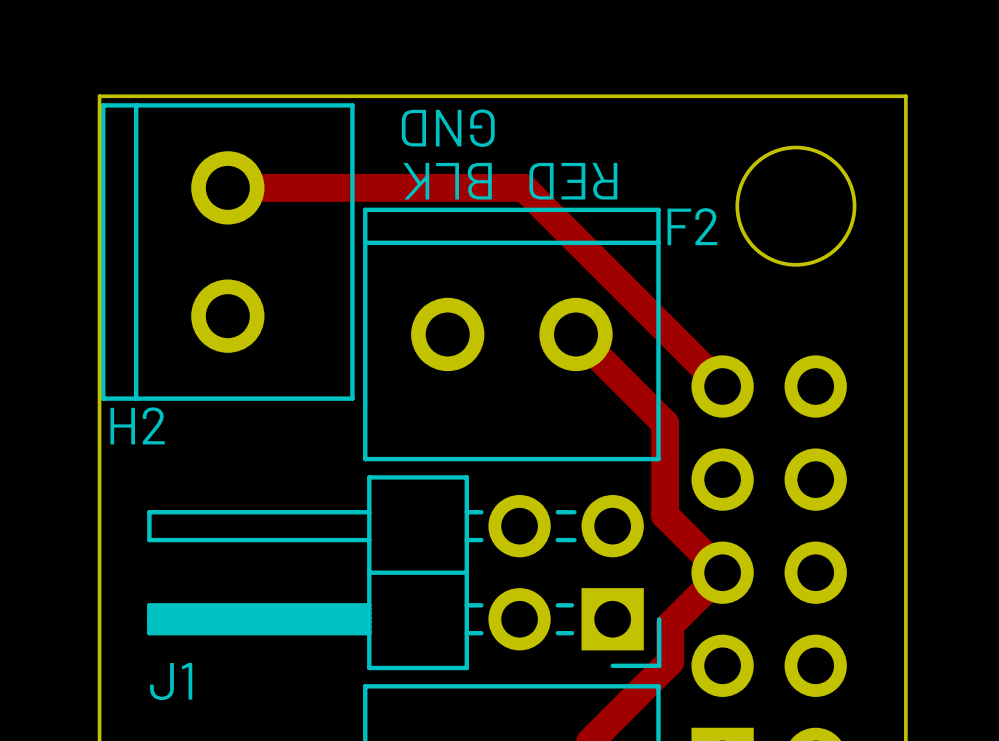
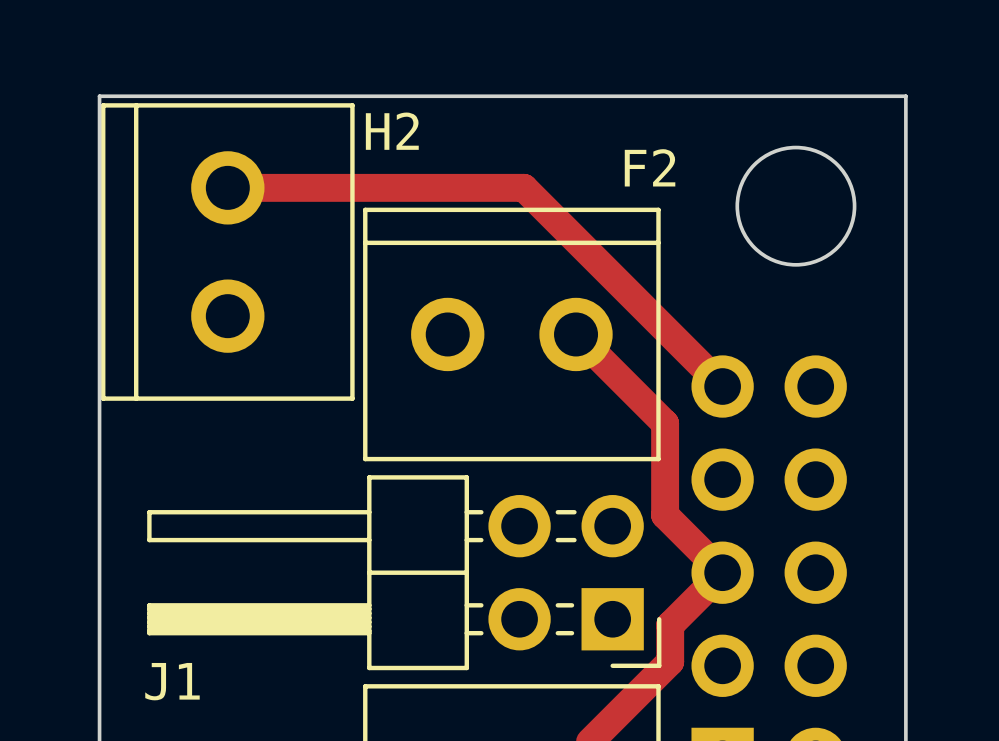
text: GND (448, 128) -> none
text: BLK (447, 181) -> none
text: RED (573, 181) -> none
F2 name position: F2 (692, 226) -> F2 (650, 167)
H2 name position: H2 (137, 425) -> H2 (392, 131)

